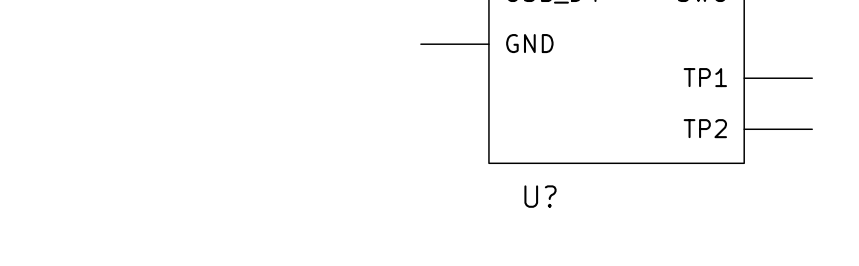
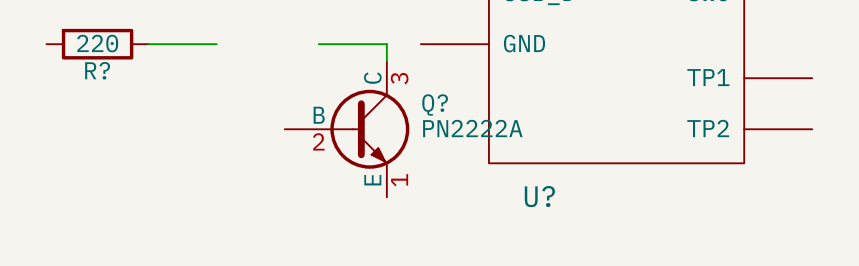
R?: none -> 220 (97, 44)
wire: none -> (148, 44) (216, 44)
wire: none -> (318, 44) (386, 44) (386, 61)
Q?: none -> PN2222A (347, 129)

